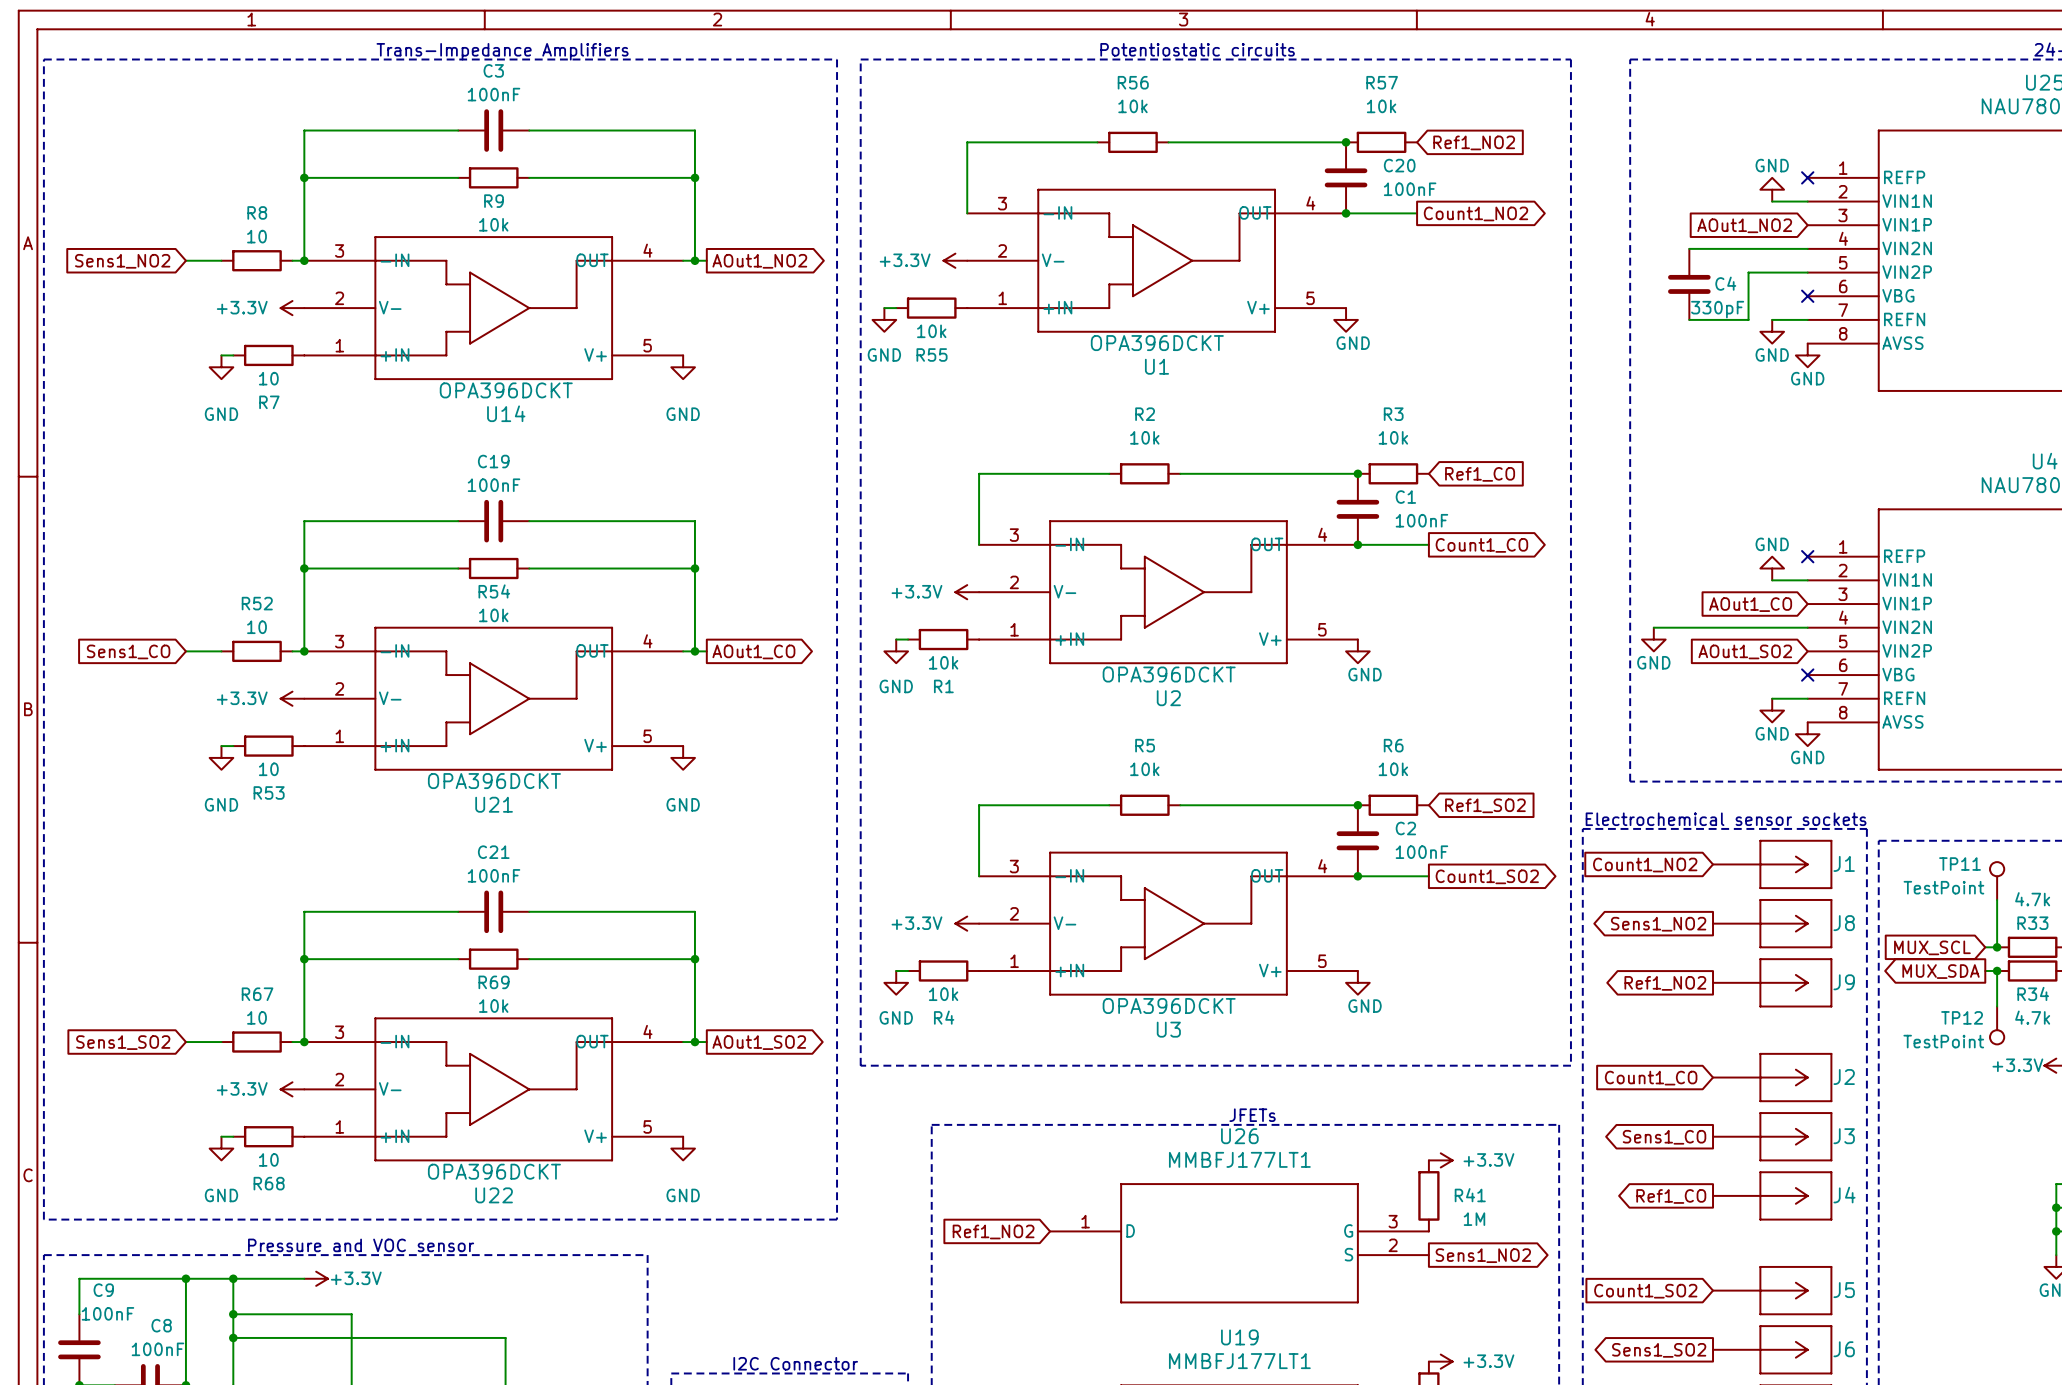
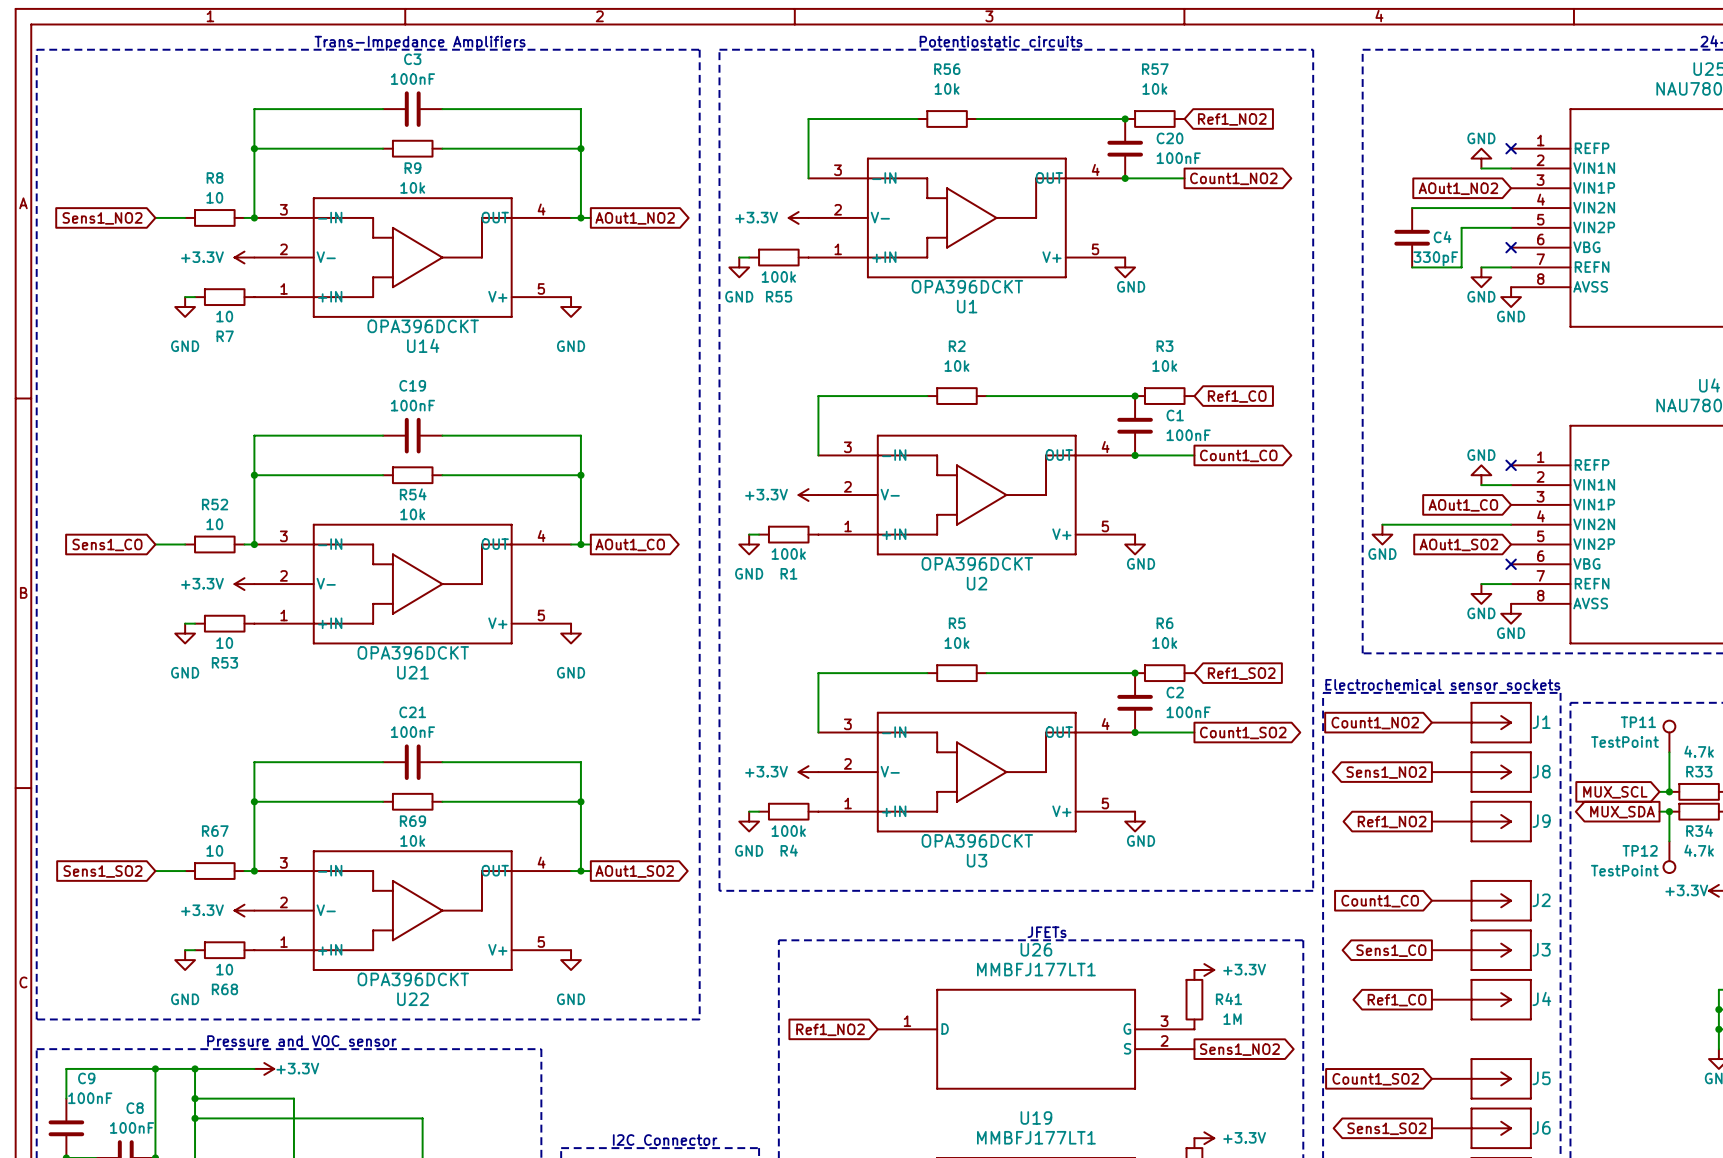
R55 value: 10k (931, 331) -> 100k (778, 276)
R1 value: 10k (943, 662) -> 100k (788, 554)
R4 value: 10k (943, 994) -> 100k (788, 831)

